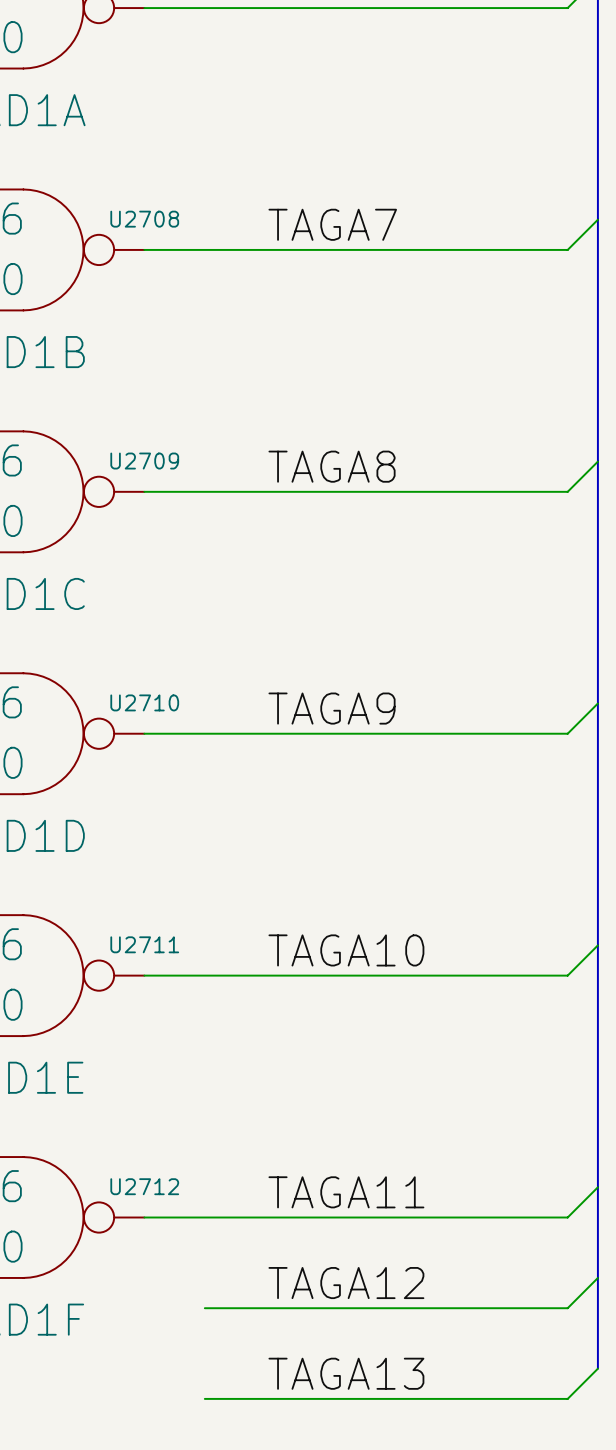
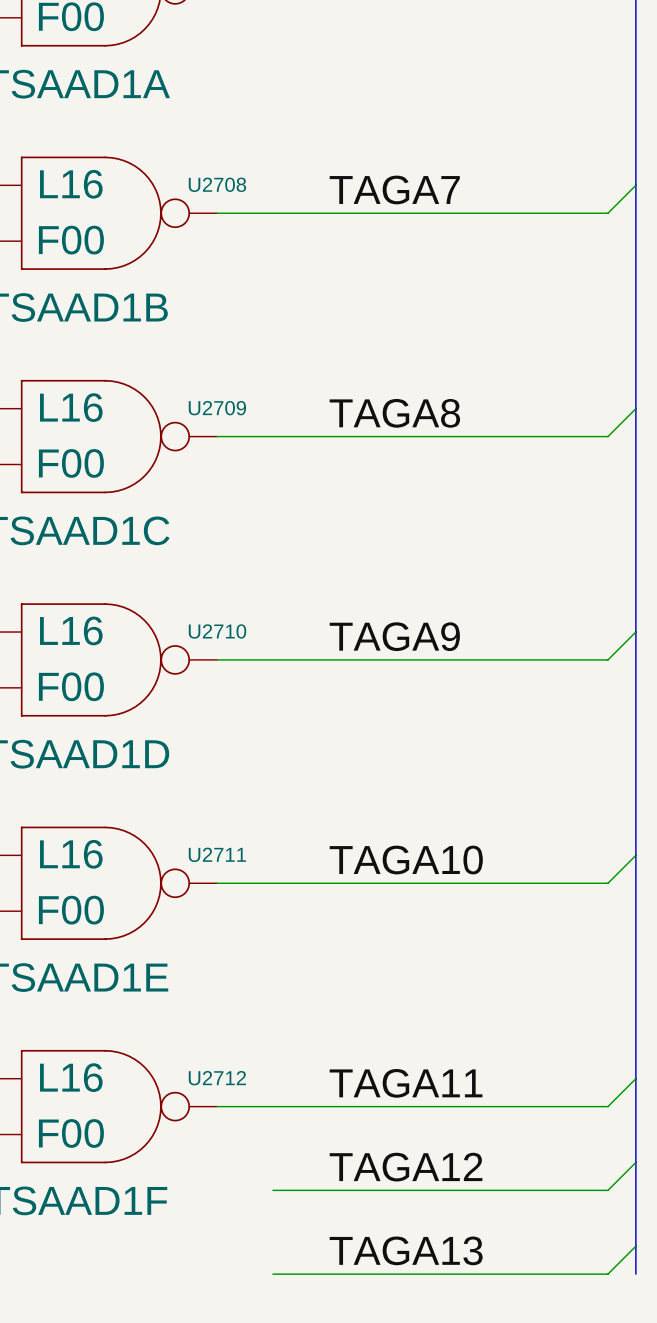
bus: none -> (635, 1246) (635, 1274)

